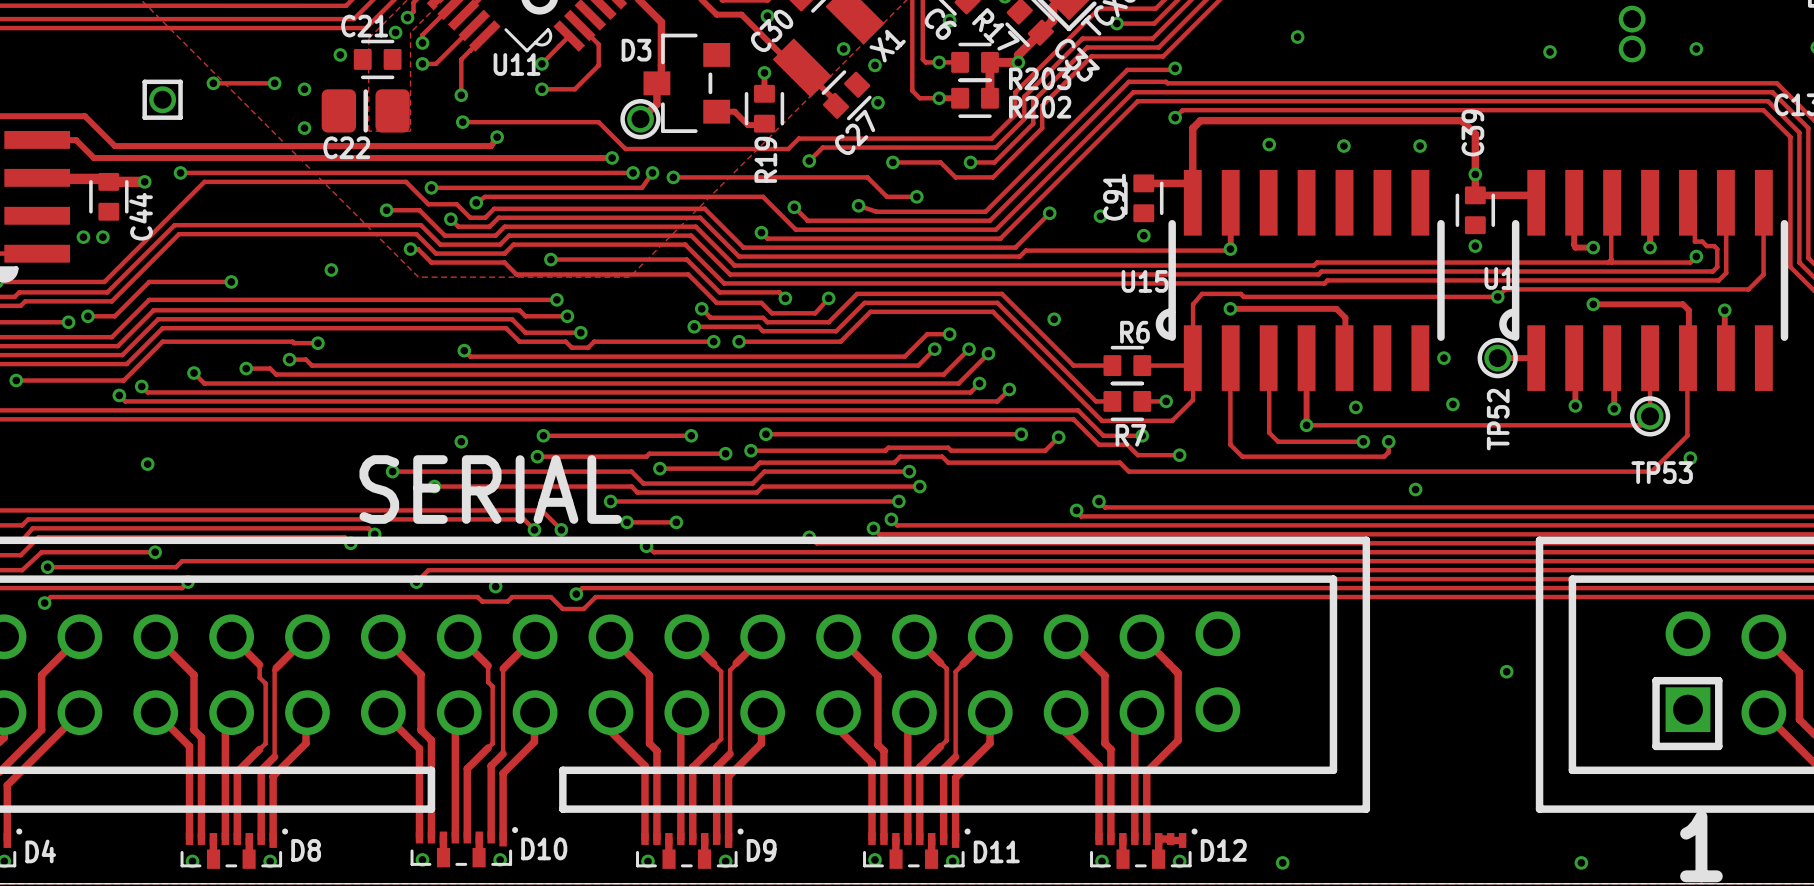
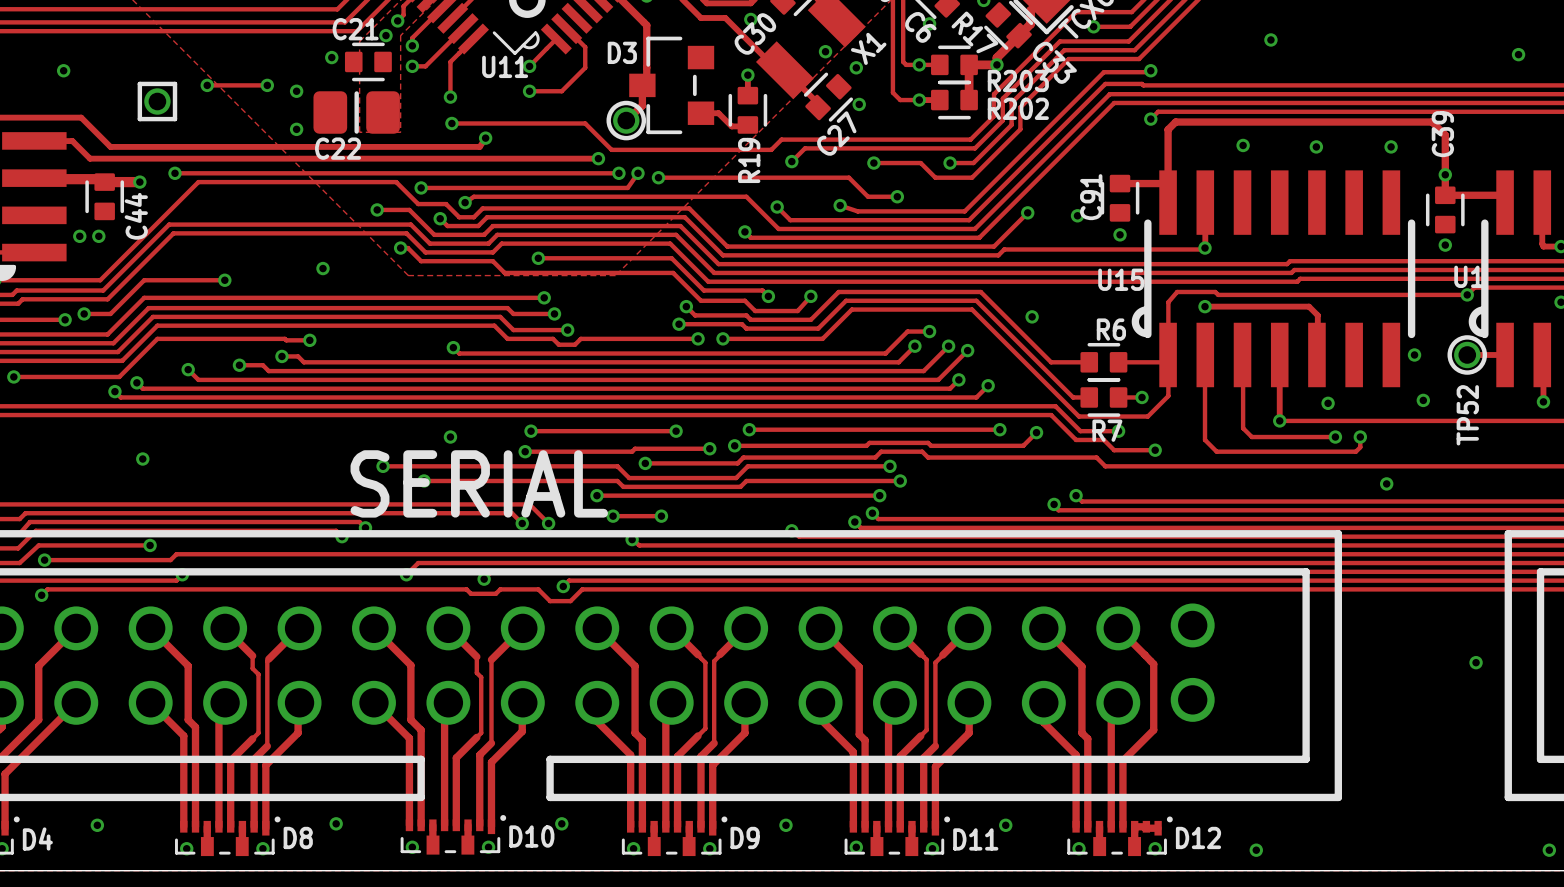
via: none -> (63, 70)
via: none -> (336, 823)
via: none -> (561, 823)
via: none -> (97, 825)
via: none -> (785, 825)
via: none -> (1005, 825)

